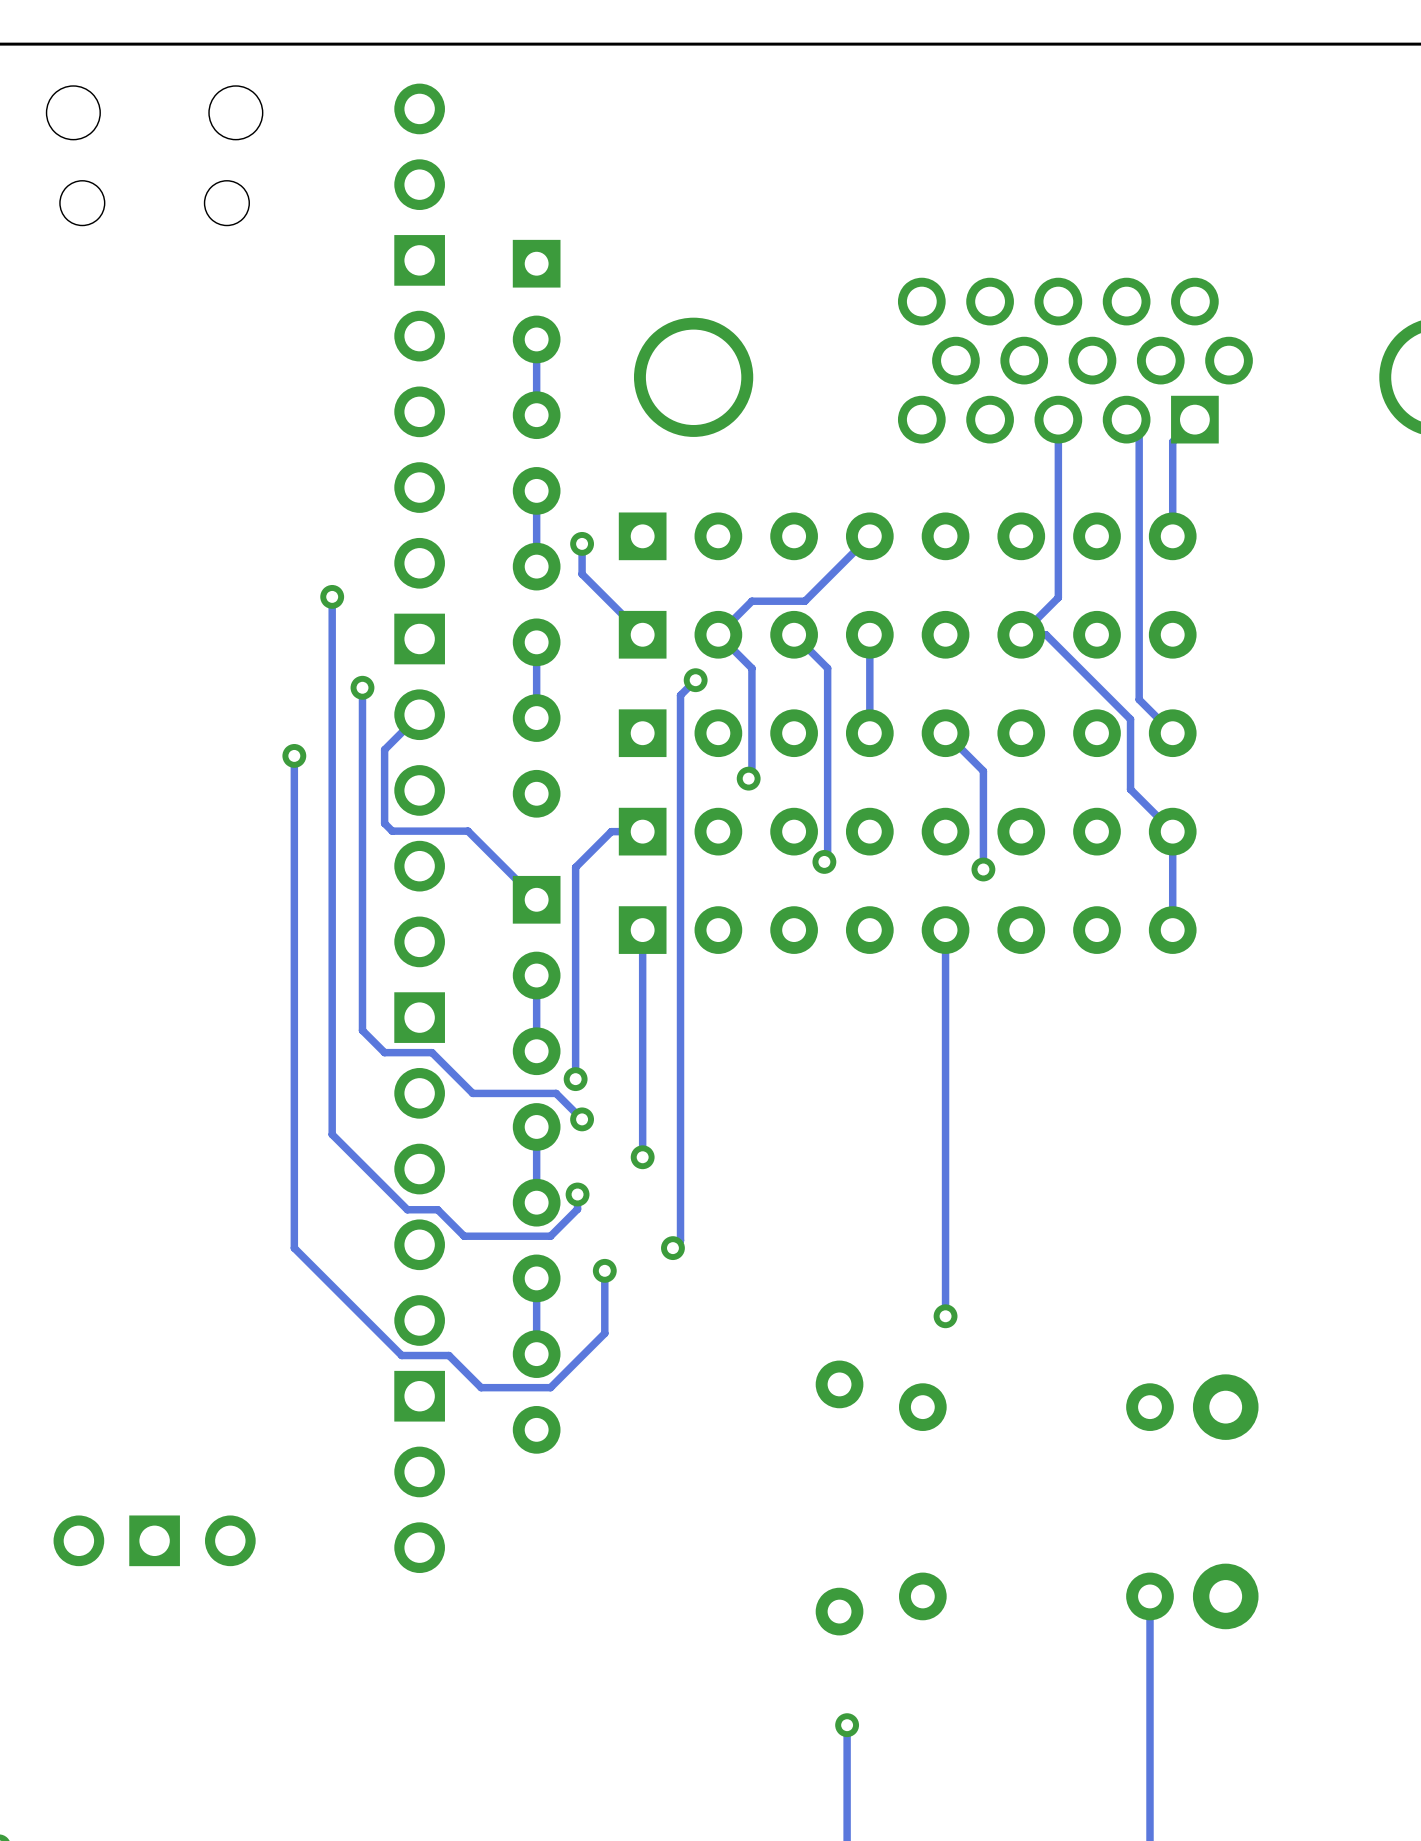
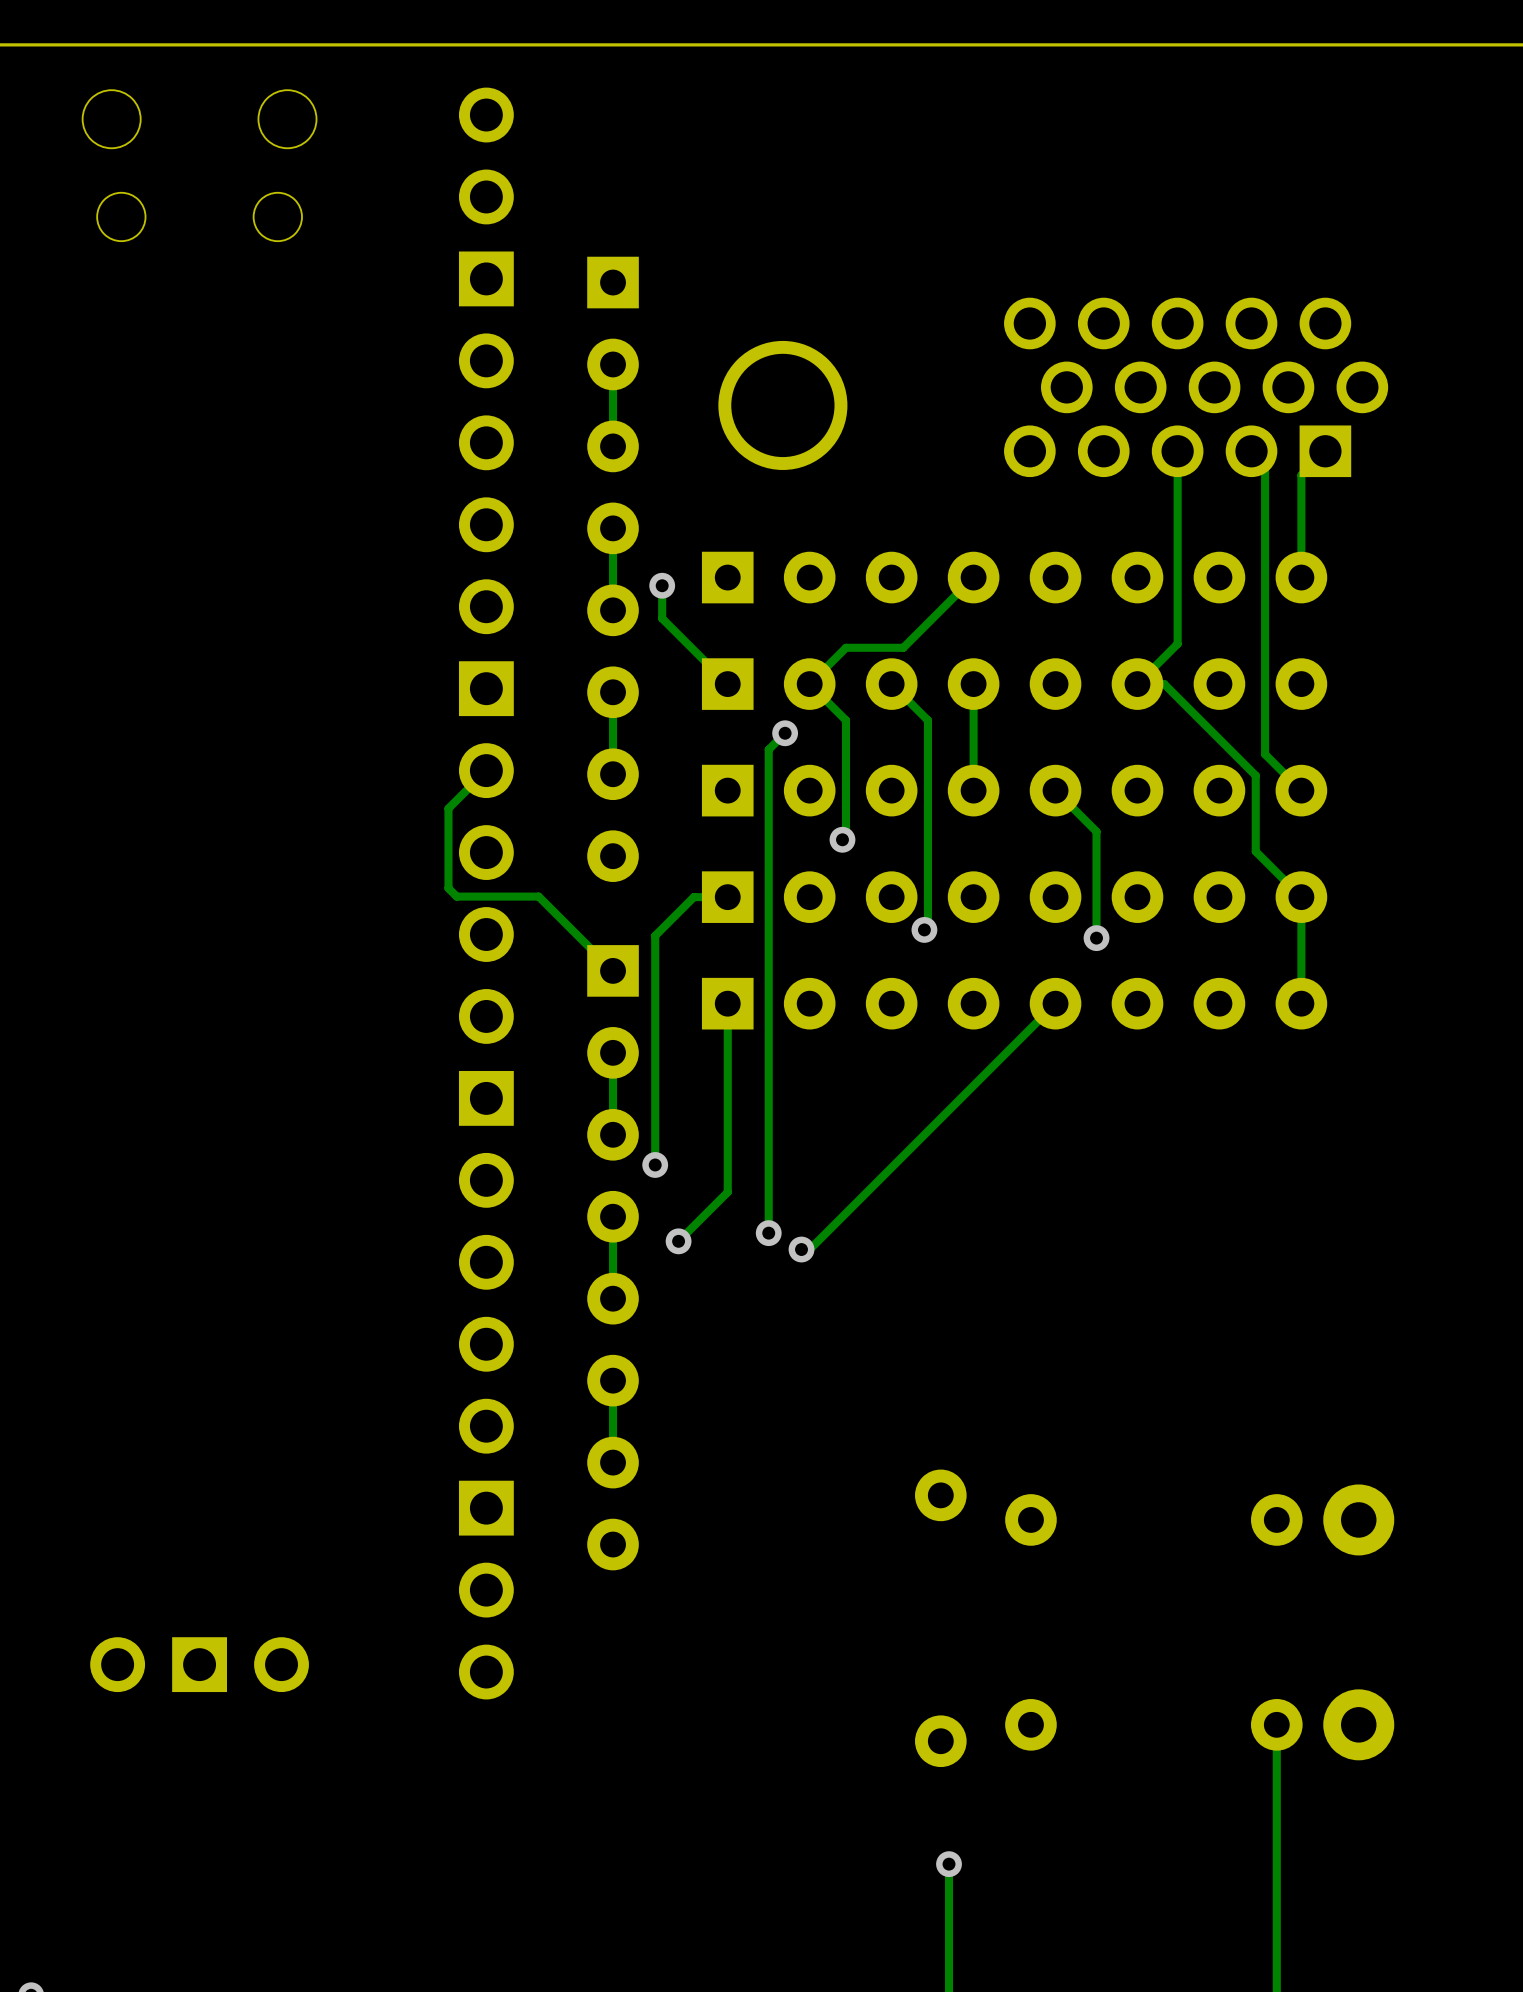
track: (332, 596) (332, 1134) (407, 1209) (437, 1209) (464, 1236) (550, 1236) (577, 1209) (577, 1194) -> none
via: (332, 596) -> none
track: (362, 687) (362, 1030) (384, 1052) (432, 1052) (472, 1093) (556, 1093) (582, 1119) -> none
via: (362, 687) -> none
track: (294, 755) (294, 1248) (401, 1355) (449, 1355) (481, 1387) (550, 1387) (604, 1333) (604, 1270) -> none
via: (294, 755) -> none
track: (945, 930) (945, 1316) -> (1055, 1003) (809, 1249) (801, 1249)
track: (642, 1104) (642, 1157) -> (727, 1192) (678, 1241)
via: (582, 1119) -> none
track: (680, 1142) (680, 1240) (672, 1248) -> none
via: none -> (768, 1233)
via: none -> (678, 1241)
via: (642, 1157) -> none
via: none -> (801, 1249)
via: (577, 1194) -> none
via: (672, 1248) -> none
via: (604, 1270) -> none
via: (945, 1316) -> none

